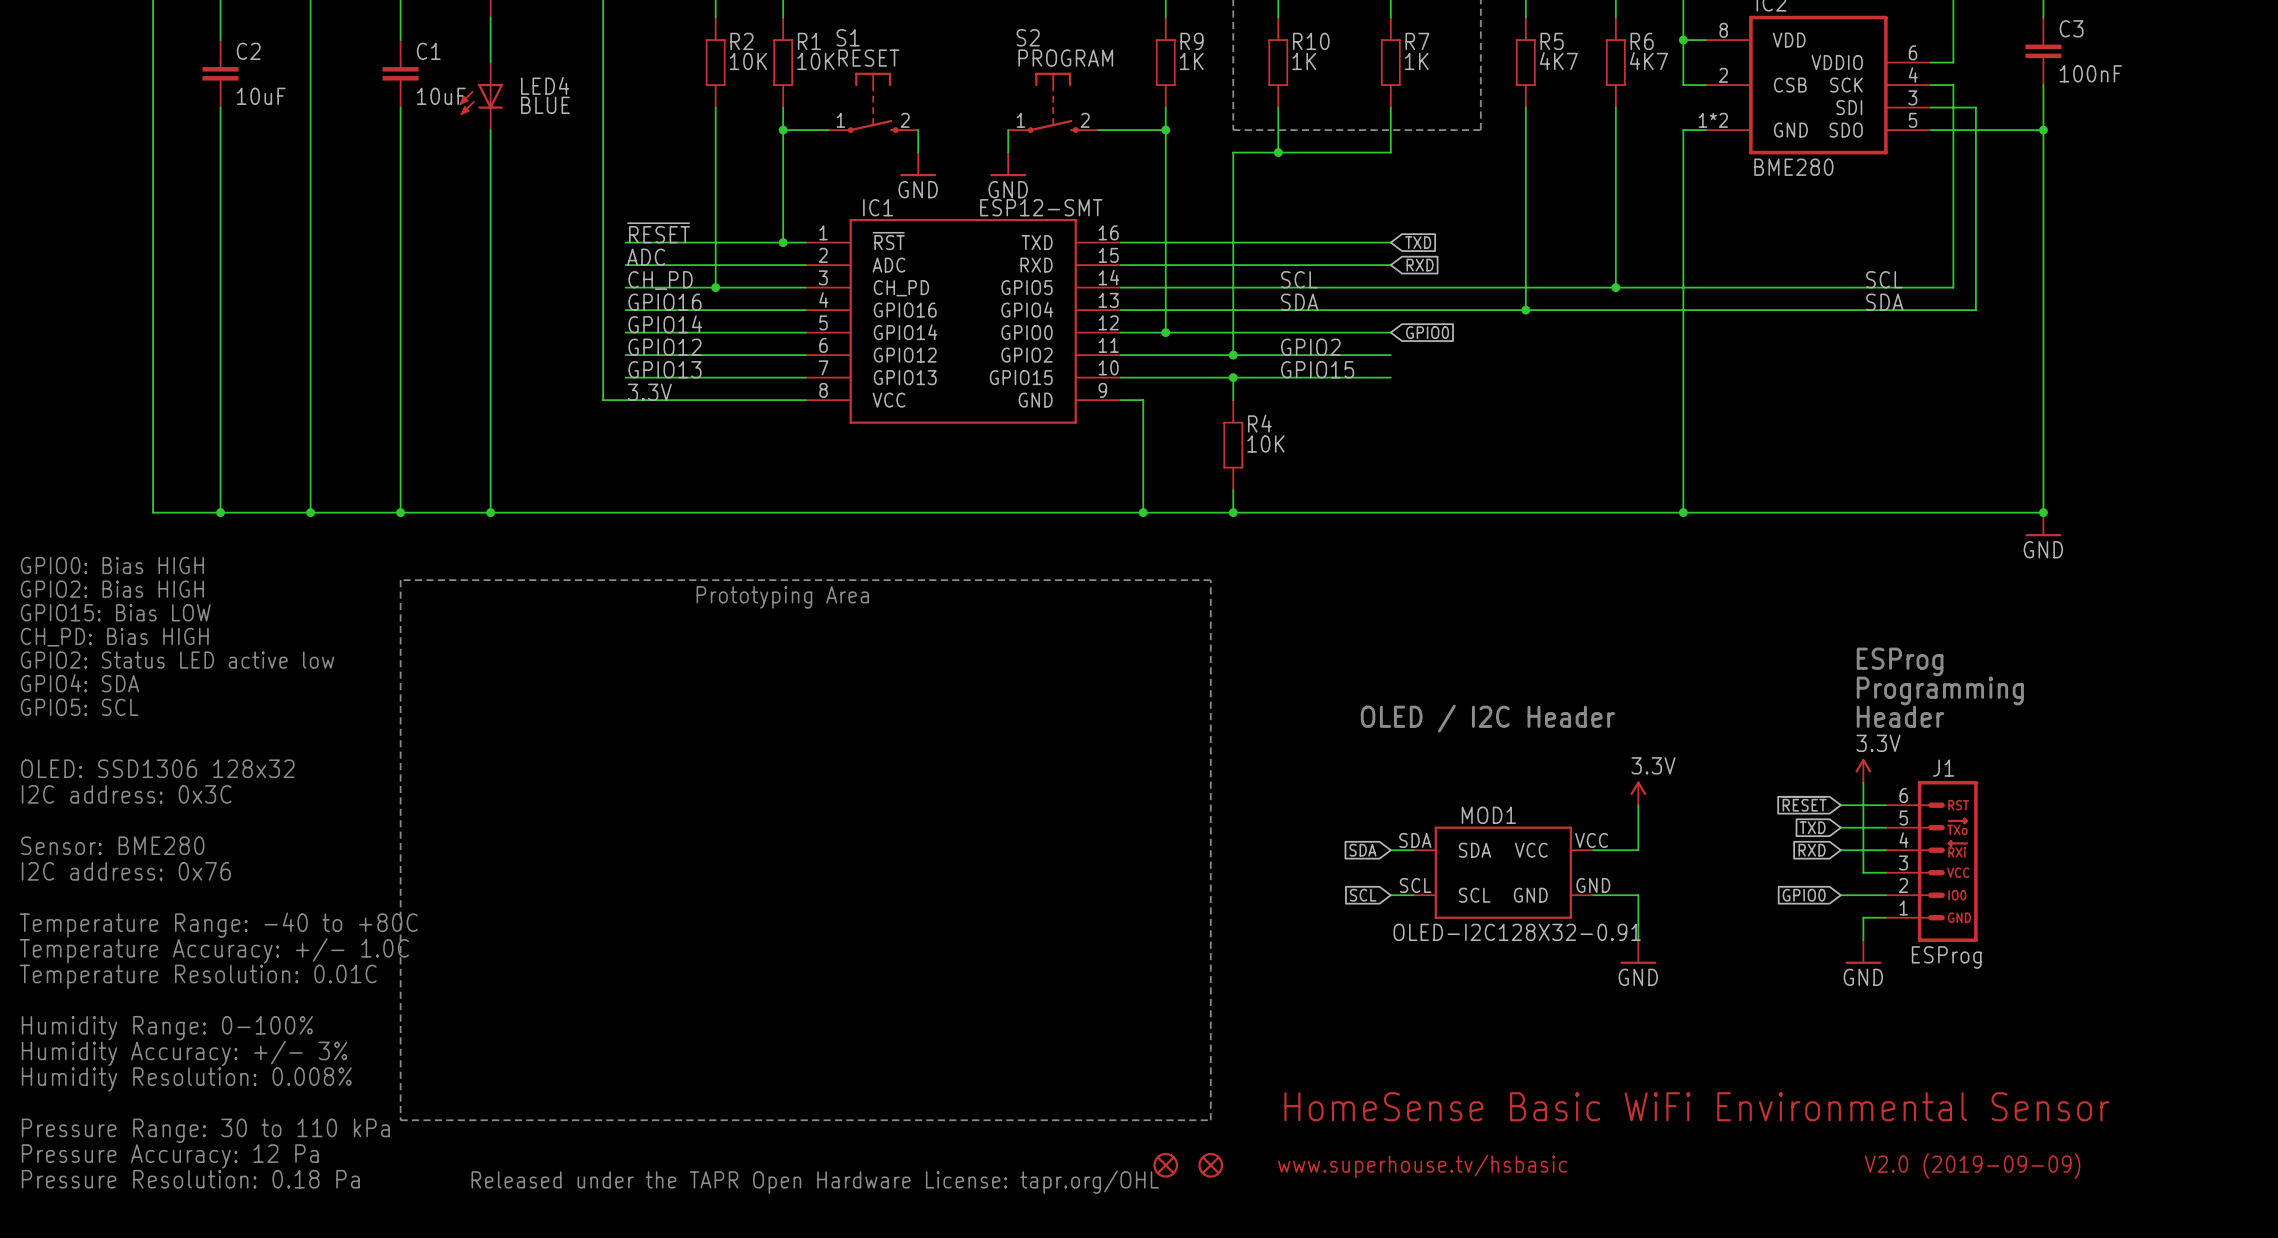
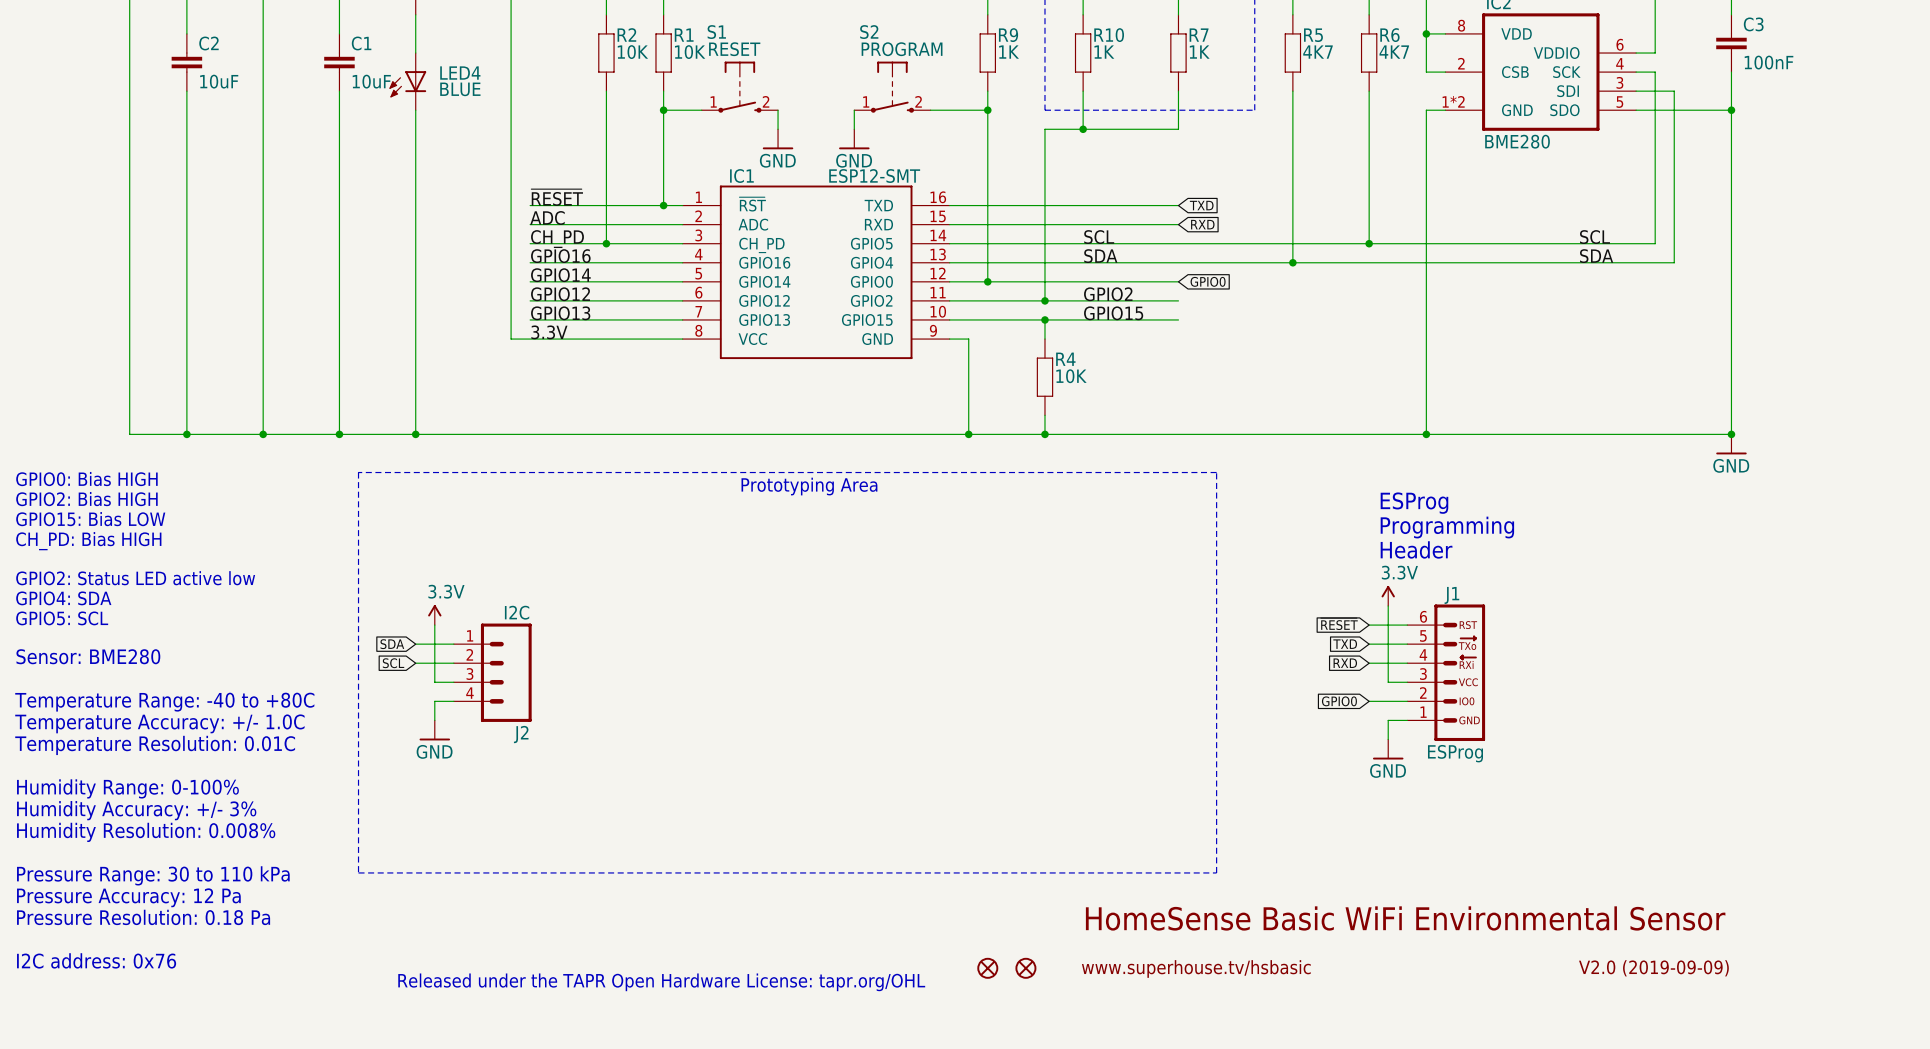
line: (400, 580) (400, 1120) (1210, 1120) (1210, 580) (400, 580) -> (358, 472) (358, 872) (1216, 872) (1216, 472) (358, 472)
text: none -> ESProg (1414, 503)
text position: Prototyping Area (782, 597) -> Prototyping Area (809, 486)
text: none -> Programming (1447, 527)
text: none -> Header (1416, 549)
text position: GPIO2: Status LED active low (177, 660) -> GPIO2: Status LED active low (135, 578)
text: ESProg (1900, 661) -> none
text position: GPIO4: SDA (79, 683) -> GPIO4: SDA (63, 598)
text: Programming (1940, 690) -> none
text position: GPIO5: SCL (79, 707) -> GPIO5: SCL (62, 618)
wire: none -> (1388, 606) (1388, 682) (1407, 682)
text: Header (1900, 716) -> none
text: OLED / I2C Header (1487, 718) -> none
power symbol: none -> 3.3V (434, 615)
global label: none -> ~{RESET} (1339, 624)
wire: none -> (434, 625) (434, 682) (453, 682)
wire: none -> (1369, 625) (1407, 625)
global label: none -> SDA (392, 644)
wire: none -> (415, 644) (453, 644)
global label: none -> TXD (1345, 644)
wire: none -> (1369, 644) (1407, 644)
text: OLED: SSD1306 128x32 (157, 768) -> none
power symbol: 3.3V (1863, 770) -> none
global label: none -> SCL (393, 663)
wire: none -> (415, 663) (453, 663)
global label: none -> RXD (1345, 663)
wire: none -> (1369, 663) (1407, 663)
wire: (1863, 782) (1863, 872) (1885, 872) -> none
J2: none -> I2C (492, 672)
power symbol position: 3.3V (1638, 793) -> 3.3V (1388, 595)
text: I2C address: 0x3C (126, 794) -> none
global label: ~{RESET} (1803, 803) -> none
wire: (1638, 805) (1638, 850) (1593, 850) -> none
wire: (1840, 805) (1885, 805) -> none
wire: none -> (453, 701) (434, 701) (434, 720)
global label: none -> GPIO0 (1339, 701)
wire: none -> (1369, 701) (1407, 701)
global label: TXD (1812, 827) -> none
wire: (1840, 827) (1885, 827) -> none
text position: Sensor: BME280 (112, 845) -> Sensor: BME280 (88, 656)
global label: SDA (1362, 850) -> none
wire: (1390, 850) (1413, 850) -> none
wire: none -> (1407, 720) (1388, 720) (1388, 739)
global label: RXD (1812, 850) -> none
wire: (1840, 850) (1885, 850) -> none
J1 position: (1931, 861) -> (1446, 672)
power symbol: none -> GND (434, 730)
text: I2C address: 0x76 (126, 871) -> none
MOD1: OLED-I2C128X32-0.91 (1503, 872) -> none
global label: SCL (1363, 895) -> none
wire: (1390, 895) (1413, 895) -> none
wire: (1593, 895) (1638, 895) (1638, 940) -> none
global label: GPIO0 (1804, 895) -> none
wire: (1840, 895) (1885, 895) -> none
wire: (1885, 917) (1863, 917) (1863, 940) -> none
text position: Temperature Range: -40 to +80C (218, 925) -> Temperature Range: -40 to +80C (164, 702)
text position: Temperature Accuracy: +/- 1.0C (214, 950) -> Temperature Accuracy: +/- 1.0C (159, 723)
power symbol position: GND (1638, 952) -> GND (1388, 749)
power symbol: GND (1863, 952) -> none
text position: Temperature Resolution: 0.01C (198, 976) -> Temperature Resolution: 0.01C (155, 745)
text position: Humidity Range: 0-100% (167, 1028) -> Humidity Range: 0-100% (127, 788)
text position: Humidity Accuracy: +/- 3% (184, 1053) -> Humidity Accuracy: +/- 3% (136, 810)
text position: Humidity Resolution: 0.008% (186, 1079) -> Humidity Resolution: 0.008% (146, 832)
text position: HomeSense Basic WiFi Environmental Sensor (1696, 1106) -> HomeSense Basic WiFi Environmental Sensor (1405, 918)
text position: Pressure Range: 30 to 110 kPa (205, 1130) -> Pressure Range: 30 to 110 kPa (153, 875)
text: none -> I2C address: 0x76 (96, 960)
text position: Pressure Accuracy: 12 Pa (170, 1156) -> Pressure Accuracy: 12 Pa (128, 897)
part position: (1165, 1165) -> (987, 968)
part position: (1210, 1165) -> (1025, 968)
text position: www.superhouse.tv/hsbasic (1422, 1166) -> www.superhouse.tv/hsbasic (1196, 968)
text position: V2.0 (2019-09-09) (1972, 1166) -> V2.0 (2019-09-09) (1653, 968)
text position: Pressure Resolution: 0.18 Pa (190, 1179) -> Pressure Resolution: 0.18 Pa (143, 917)
text position: Released under the TAPR Open Hardware License: tapr.org/OHL (815, 1182) -> Released under the TAPR Open Hardware License: tapr.org/OHL (661, 982)

